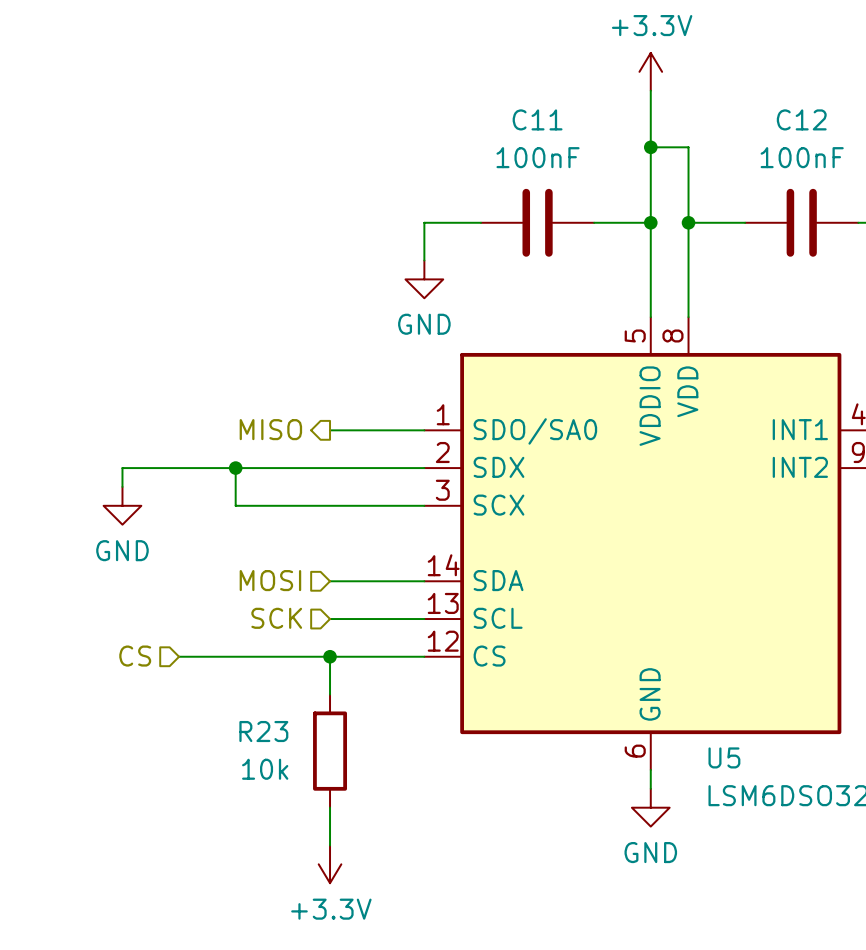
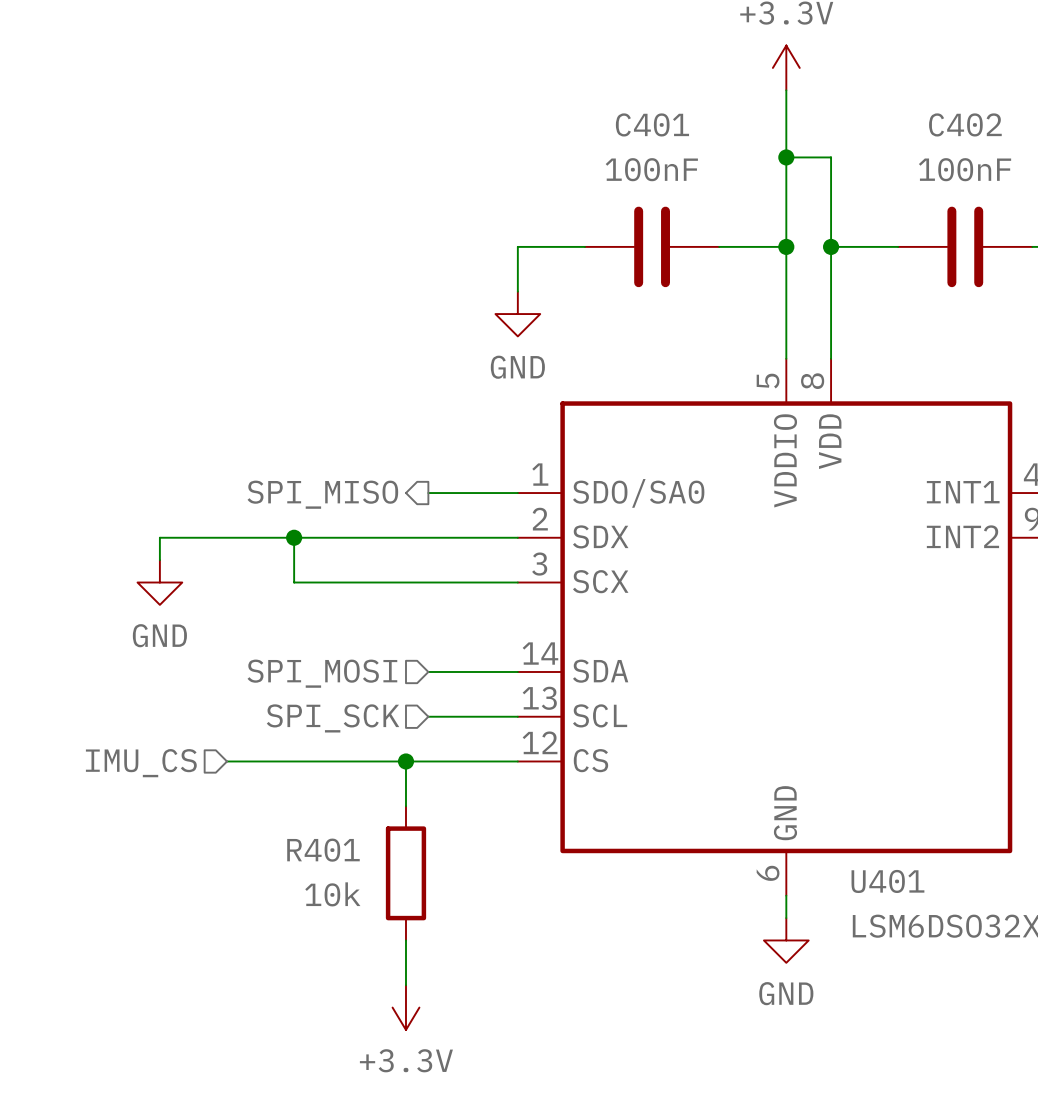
C11 name: C11 (537, 119) -> C401 (652, 124)
C12 name: C12 (801, 119) -> C402 (965, 124)
hierarchical label: MISO (270, 429) -> SPI_MISO (322, 494)
wire: (330, 430) (348, 430) -> none
hierarchical label: MOSI (270, 580) -> SPI_MOSI (322, 673)
wire: (330, 581) (348, 581) -> none
hierarchical label: SCK (276, 618) -> none
hierarchical label: none -> SPI_SCK (333, 718)
wire: (330, 619) (348, 619) -> none
hierarchical label: CS (135, 656) -> IMU_CS (141, 763)
R23 name: R23 (263, 731) -> R401 (323, 850)
U5 name: U5 (724, 757) -> U401 (887, 881)

